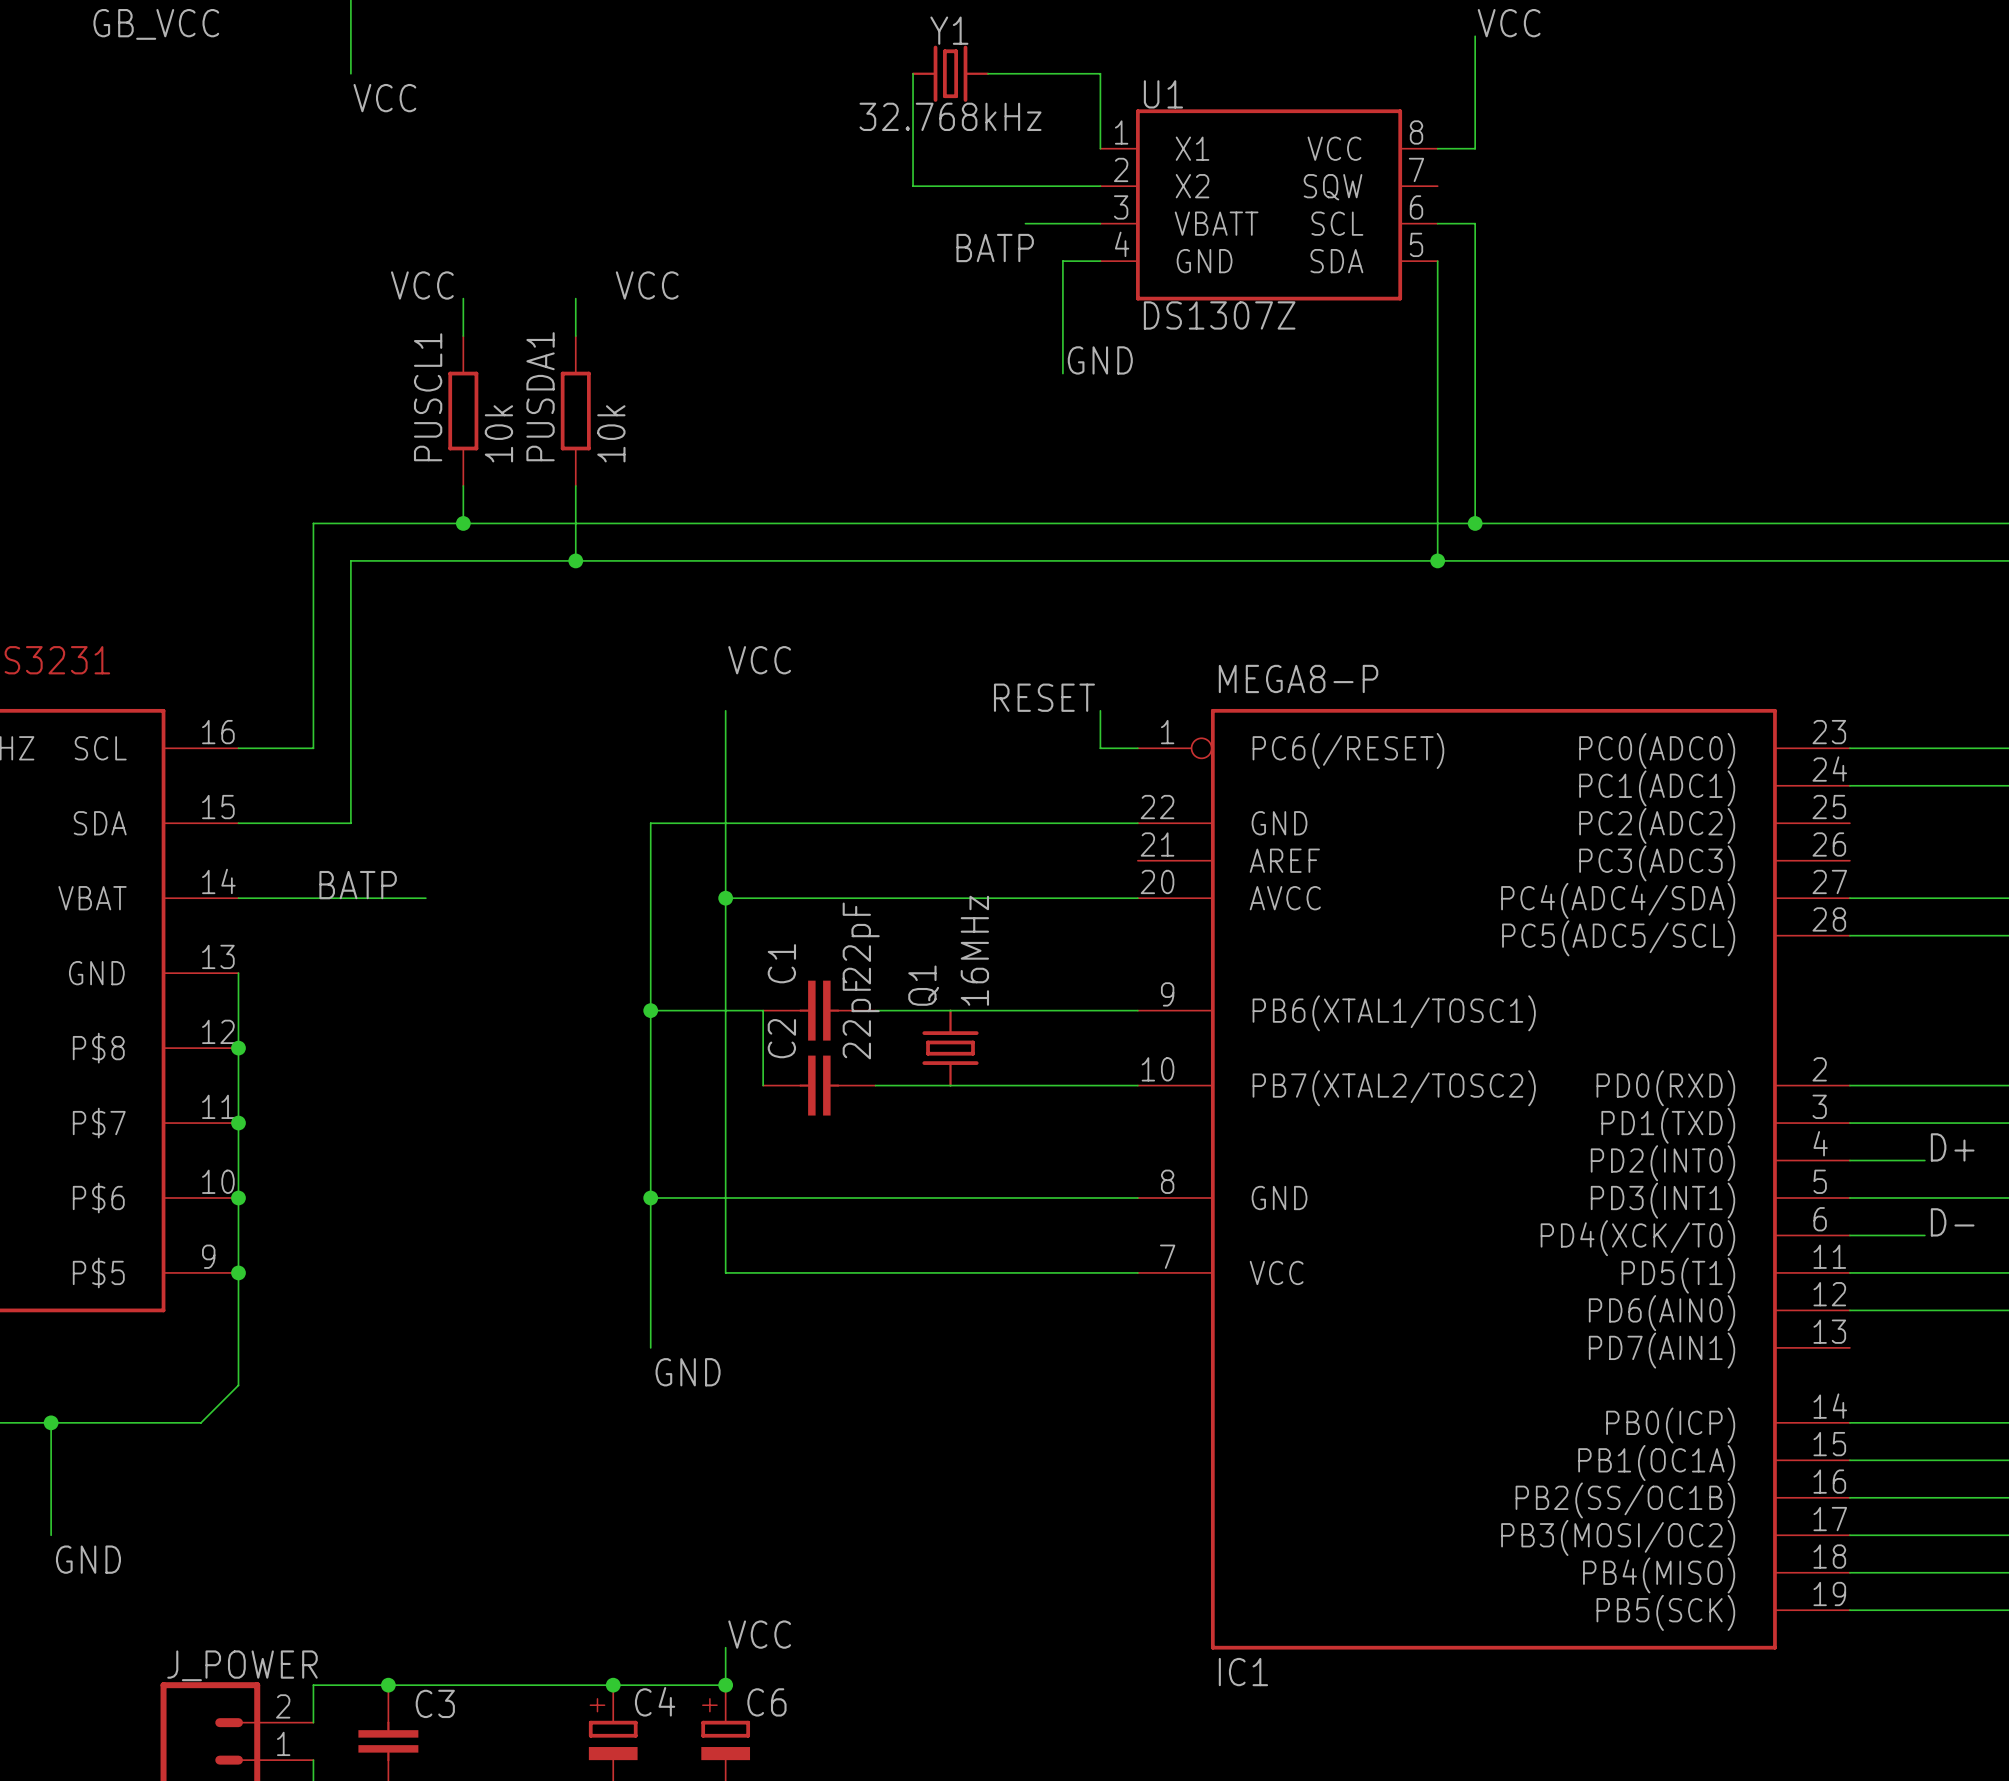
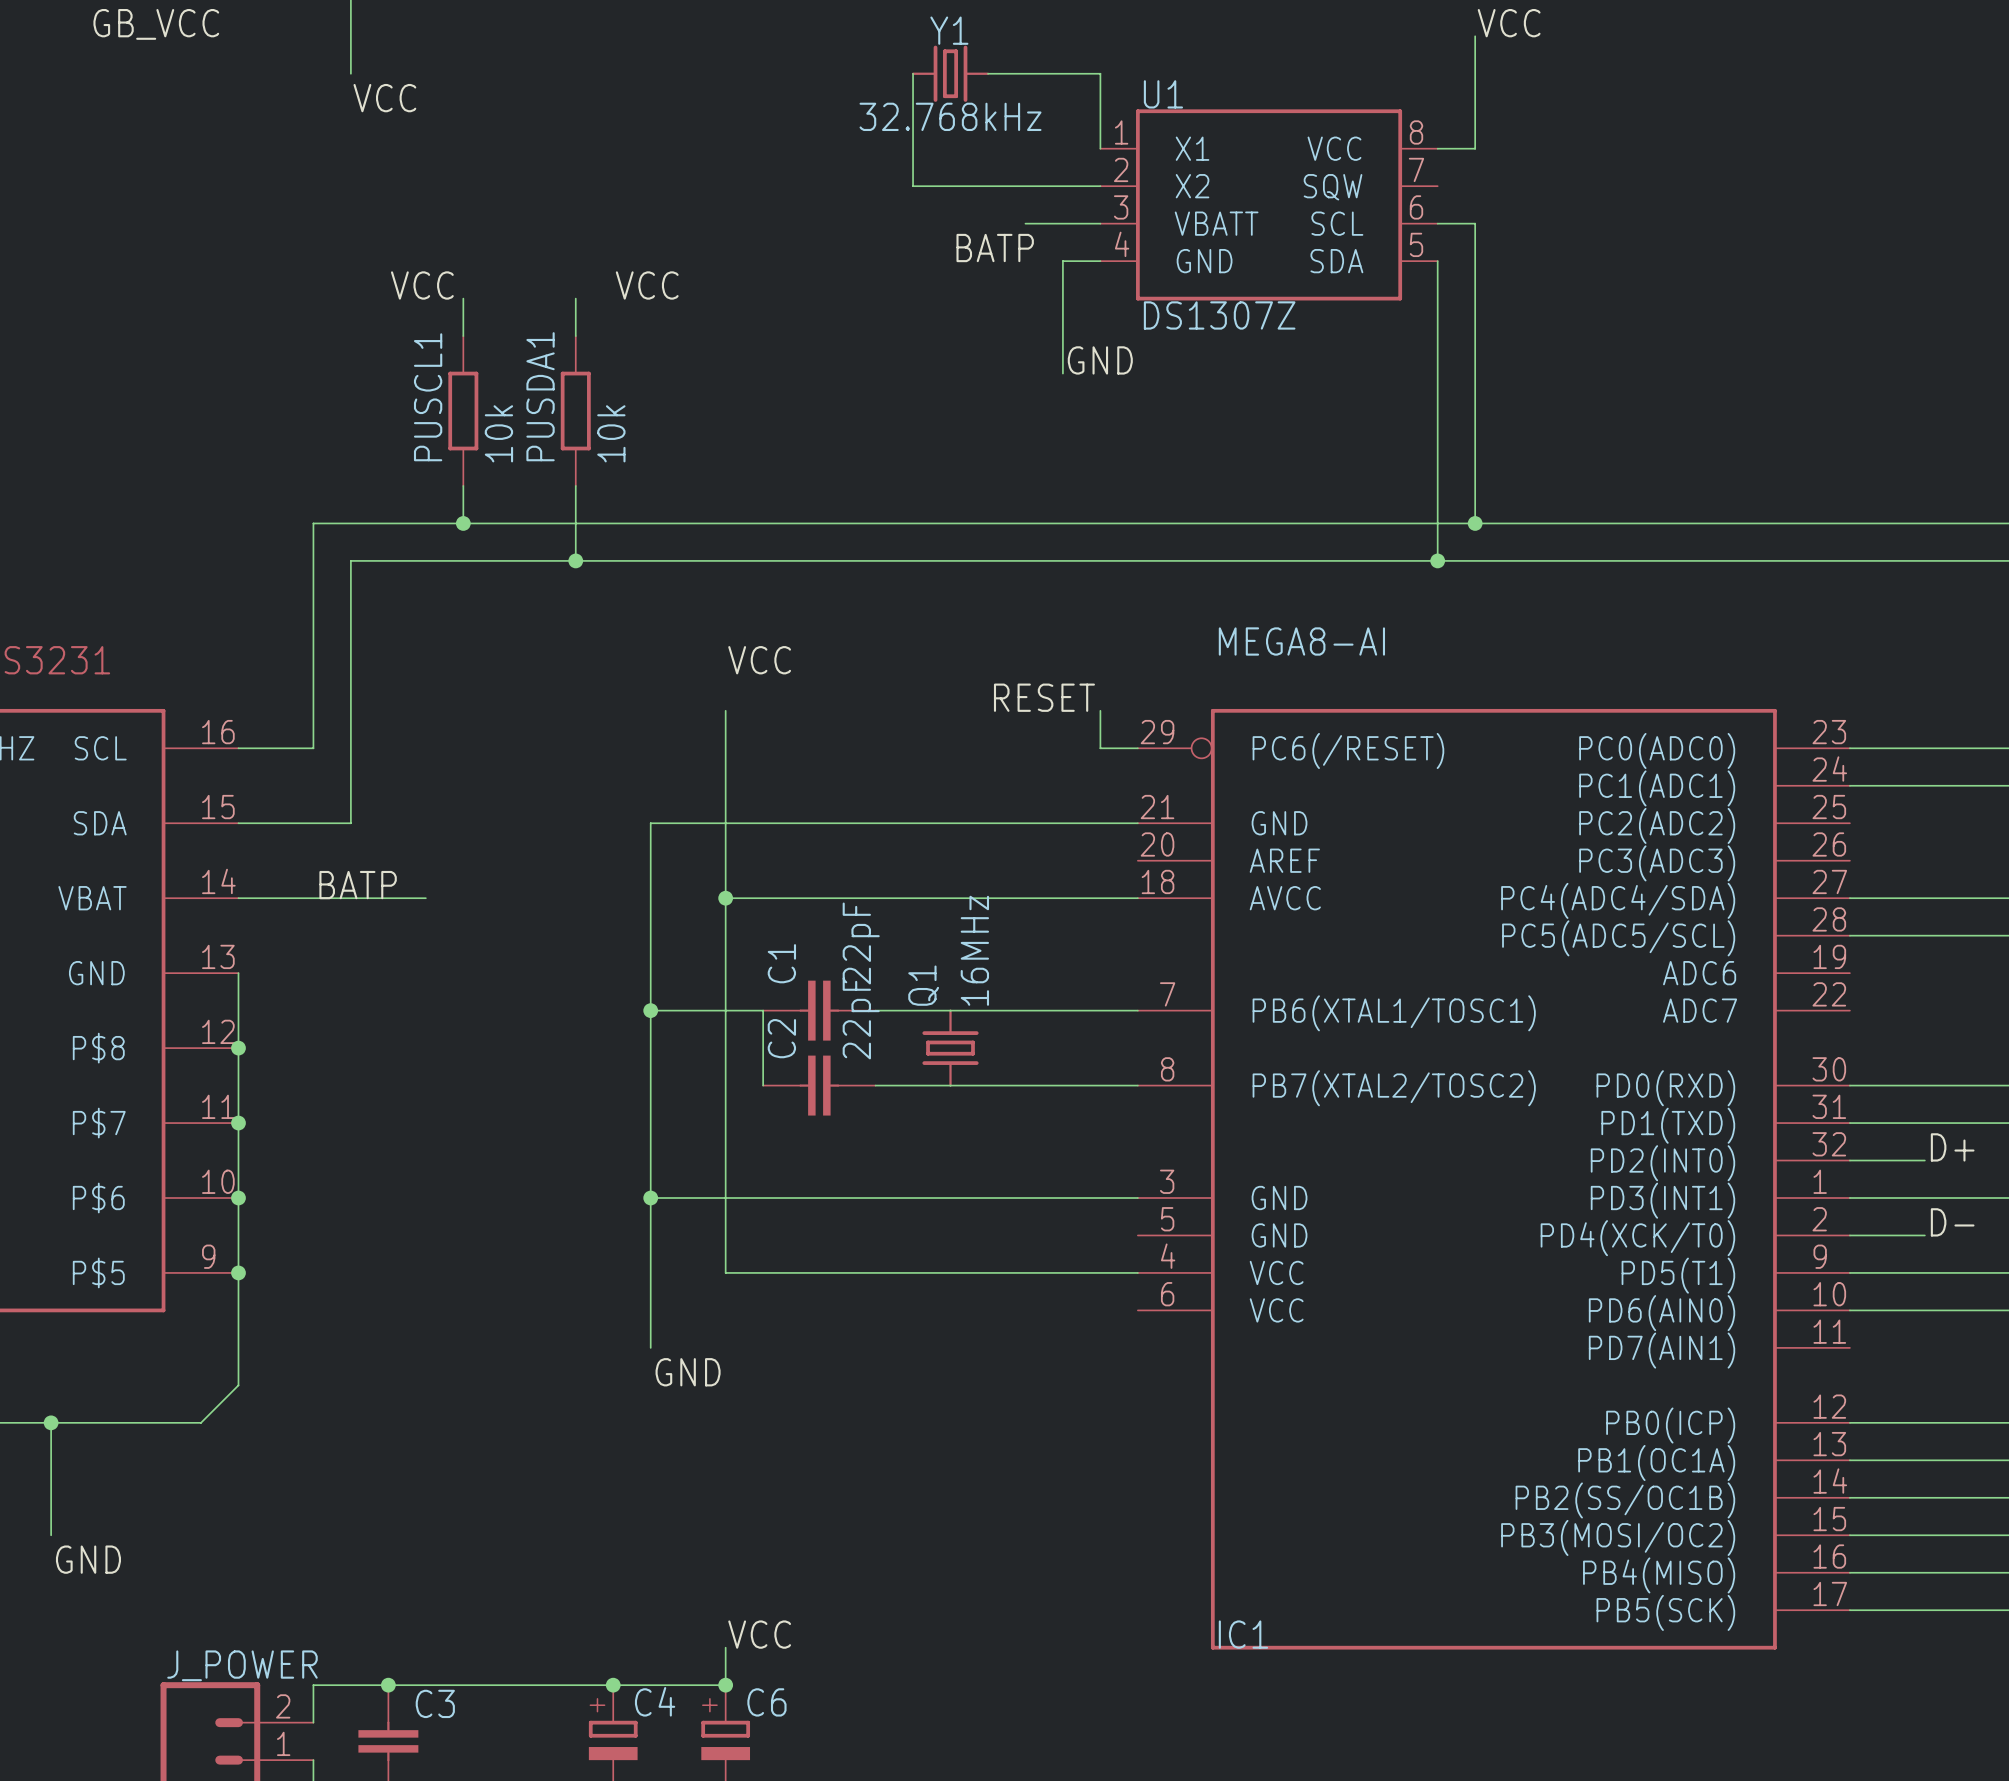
IC1 value: MEGA8-P (1298, 678) -> MEGA8-AI (1301, 641)
IC1 symbol: [1137, 708, 1850, 1650] -> [1137, 708, 1850, 1650]
IC1 name position: IC1 (1243, 1672) -> IC1 (1243, 1634)

